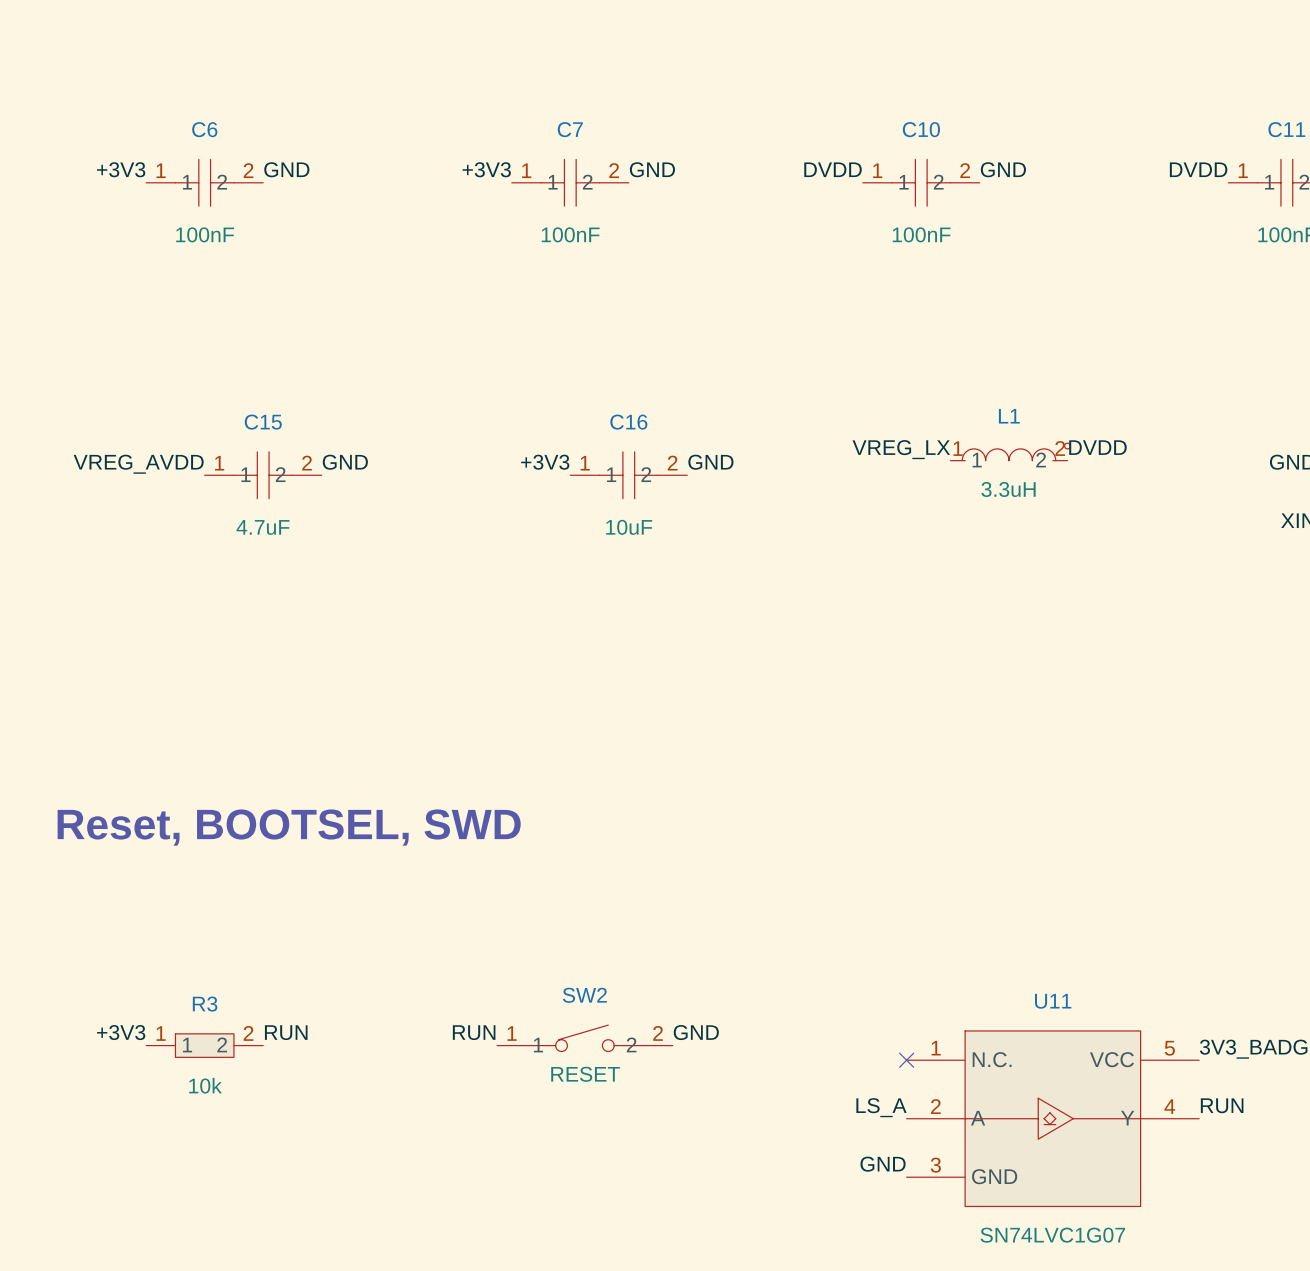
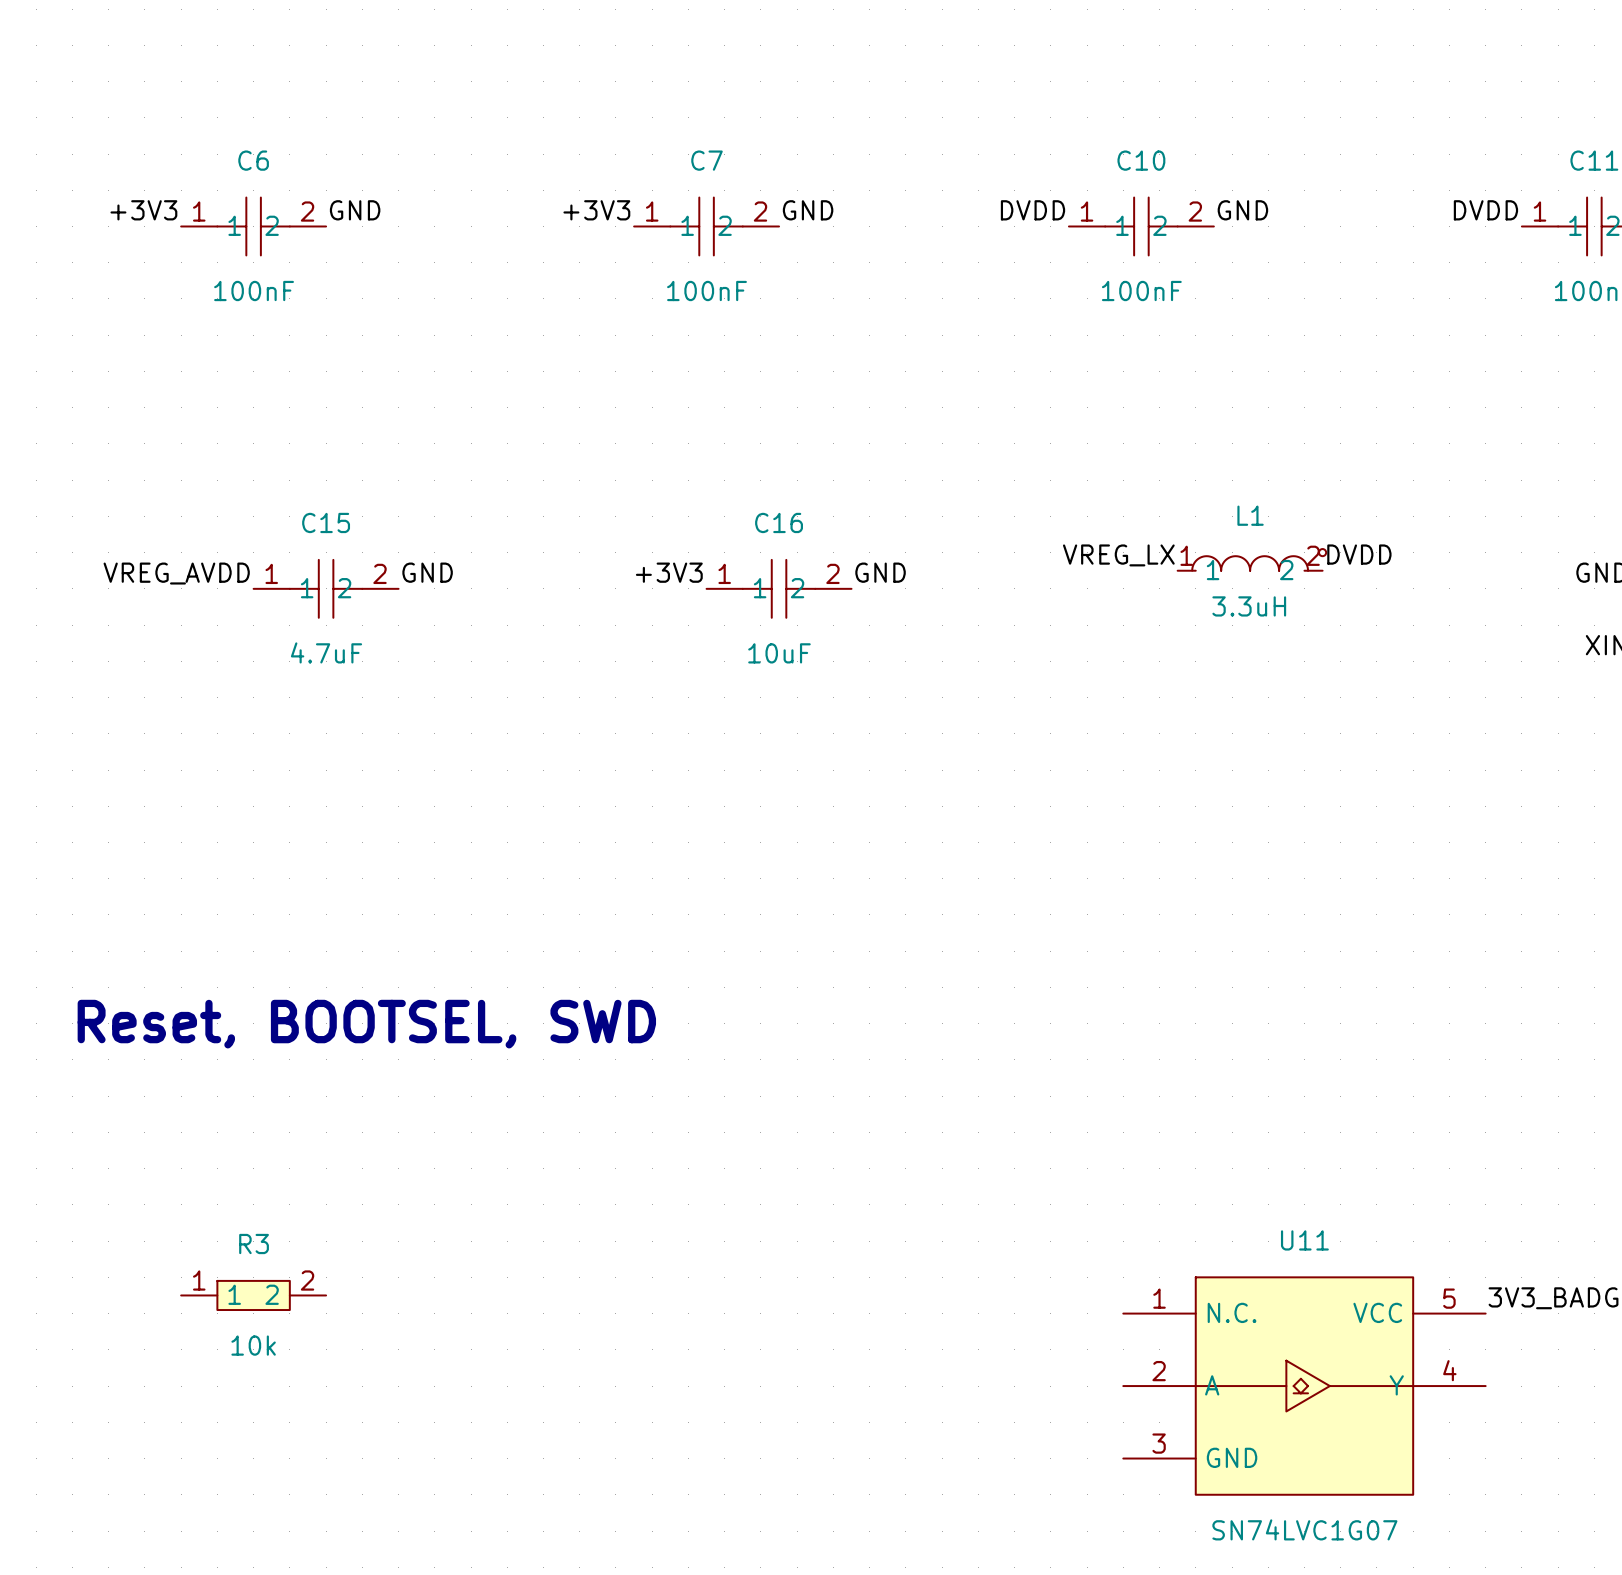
label: +3V3 (121, 1032) -> none
label: RUN (286, 1032) -> none
label: RUN (474, 1032) -> none
label: GND (696, 1032) -> none
SW2: RESET (584, 1038) -> none
no-connect mark: (906, 1060) -> none
label: RUN (1222, 1105) -> none
label: LS_A (881, 1107) -> none
label: GND (883, 1164) -> none

